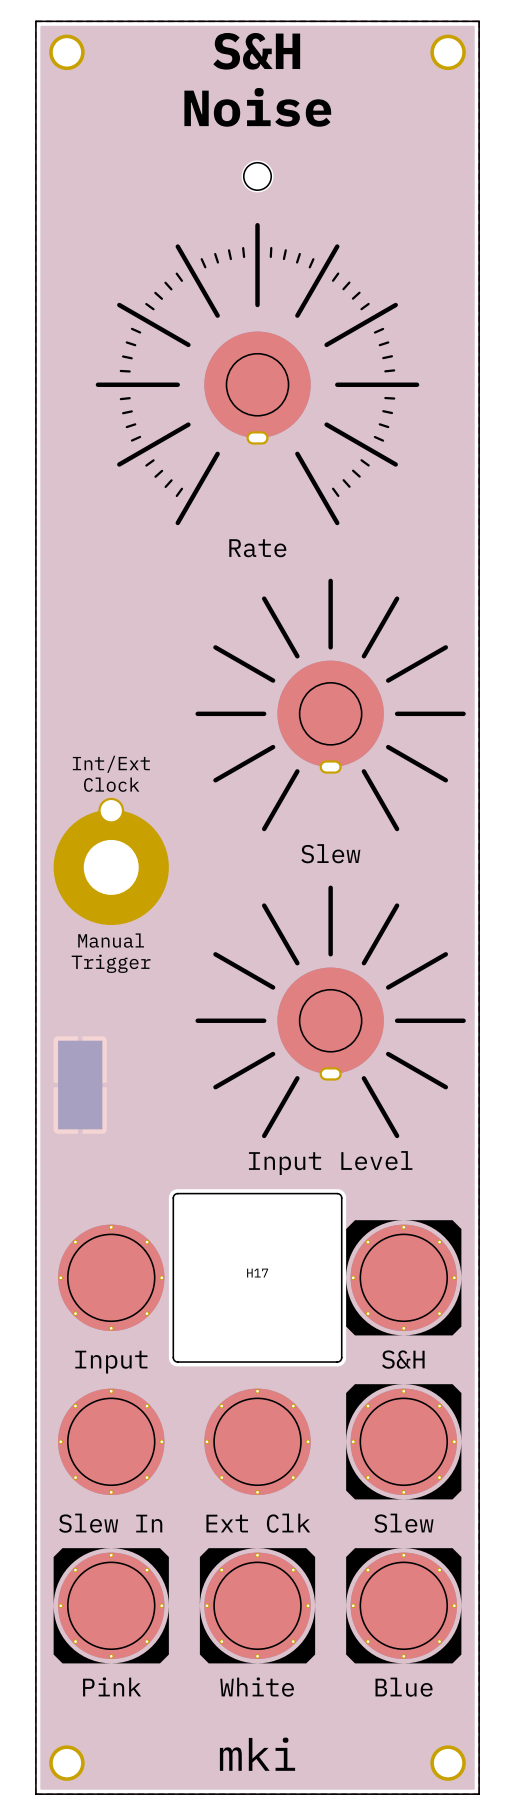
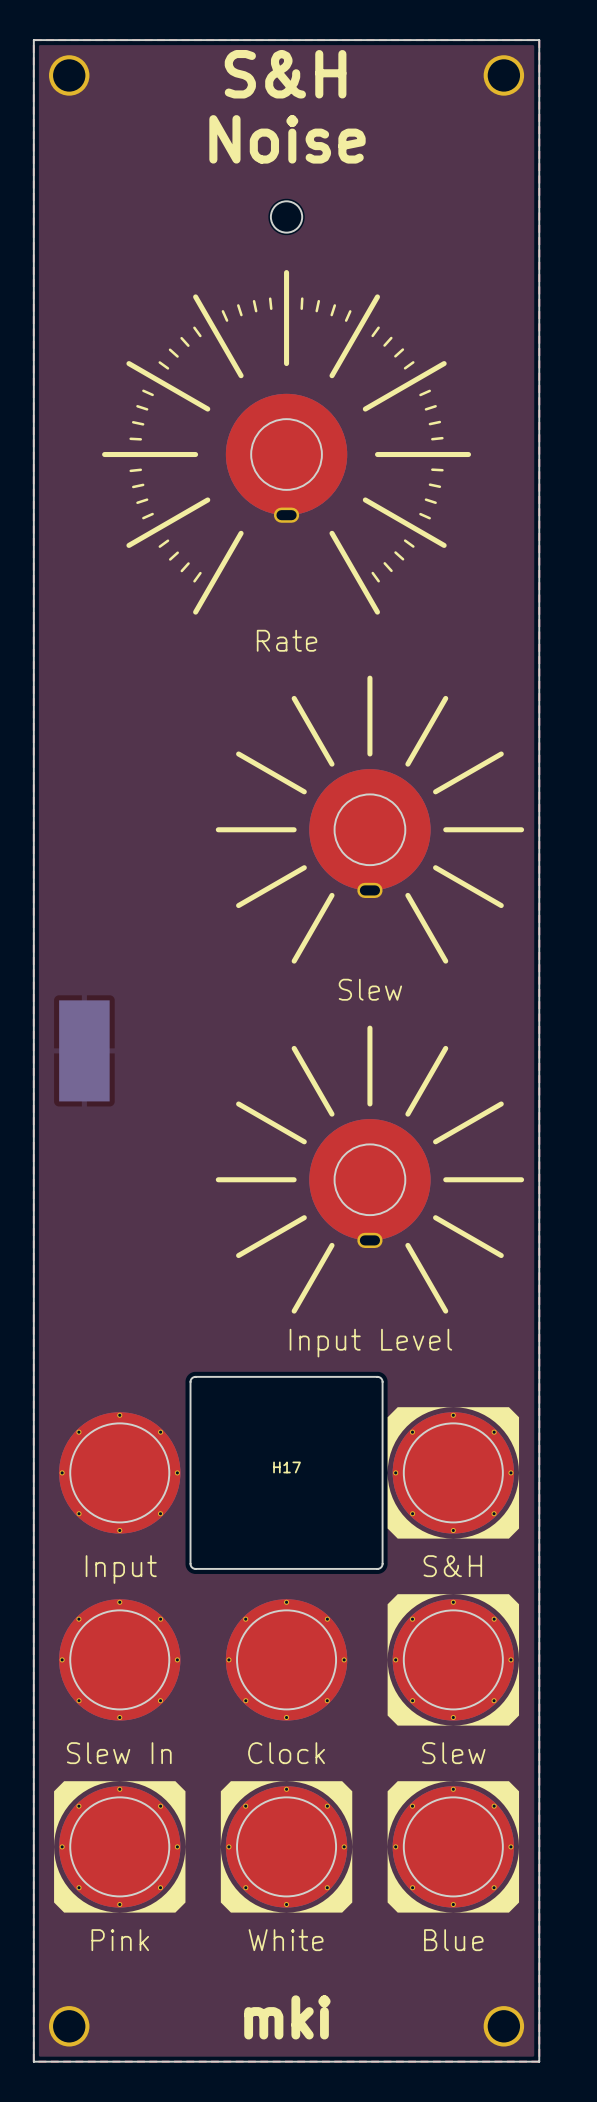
text: Int/Ext (111, 764) -> none
text: Clock (111, 784) -> none
part: (111, 861) -> none
text: Manual (111, 940) -> none
text: Trigger (111, 963) -> none
part position: (80, 1085) -> (84, 1050)
part value: Ext Clk (258, 1523) -> Clock (286, 1753)

